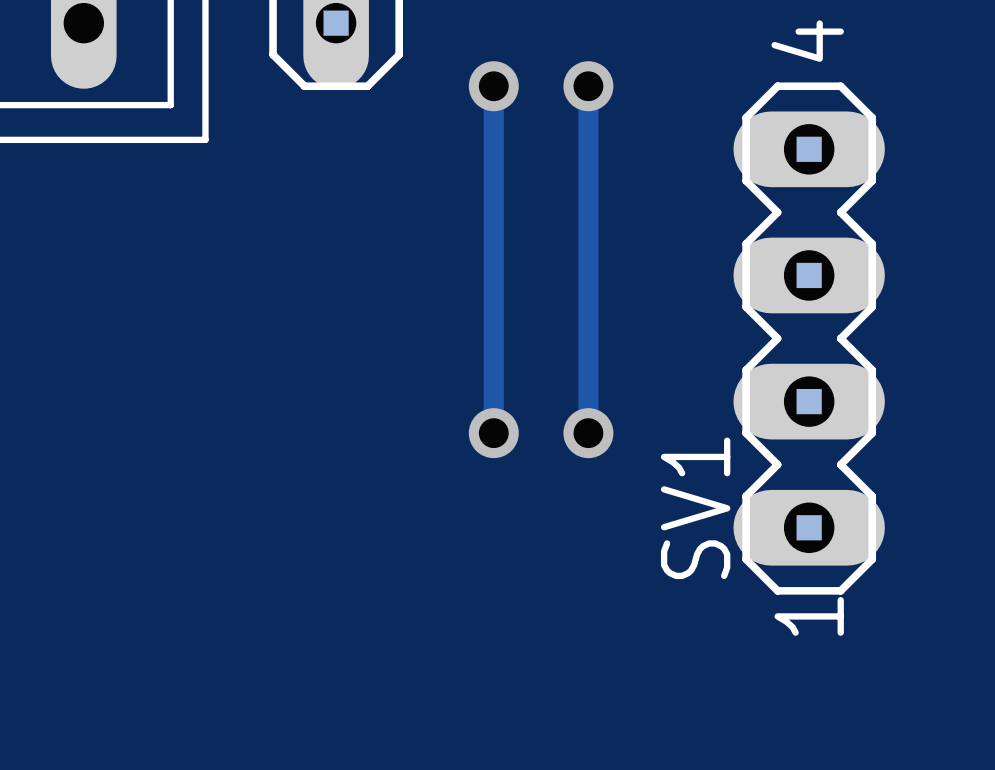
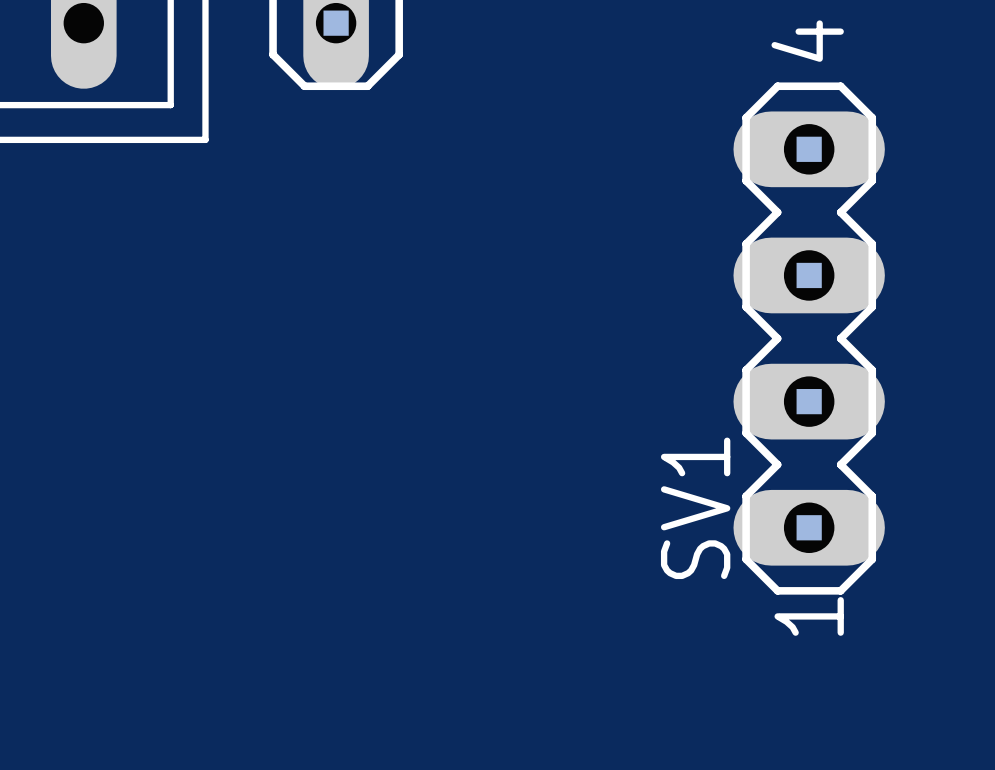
track: (493, 86) (493, 433) -> none
via: (493, 86) -> none
track: (588, 86) (588, 433) -> none
via: (588, 86) -> none
via: (493, 433) -> none
via: (588, 433) -> none

